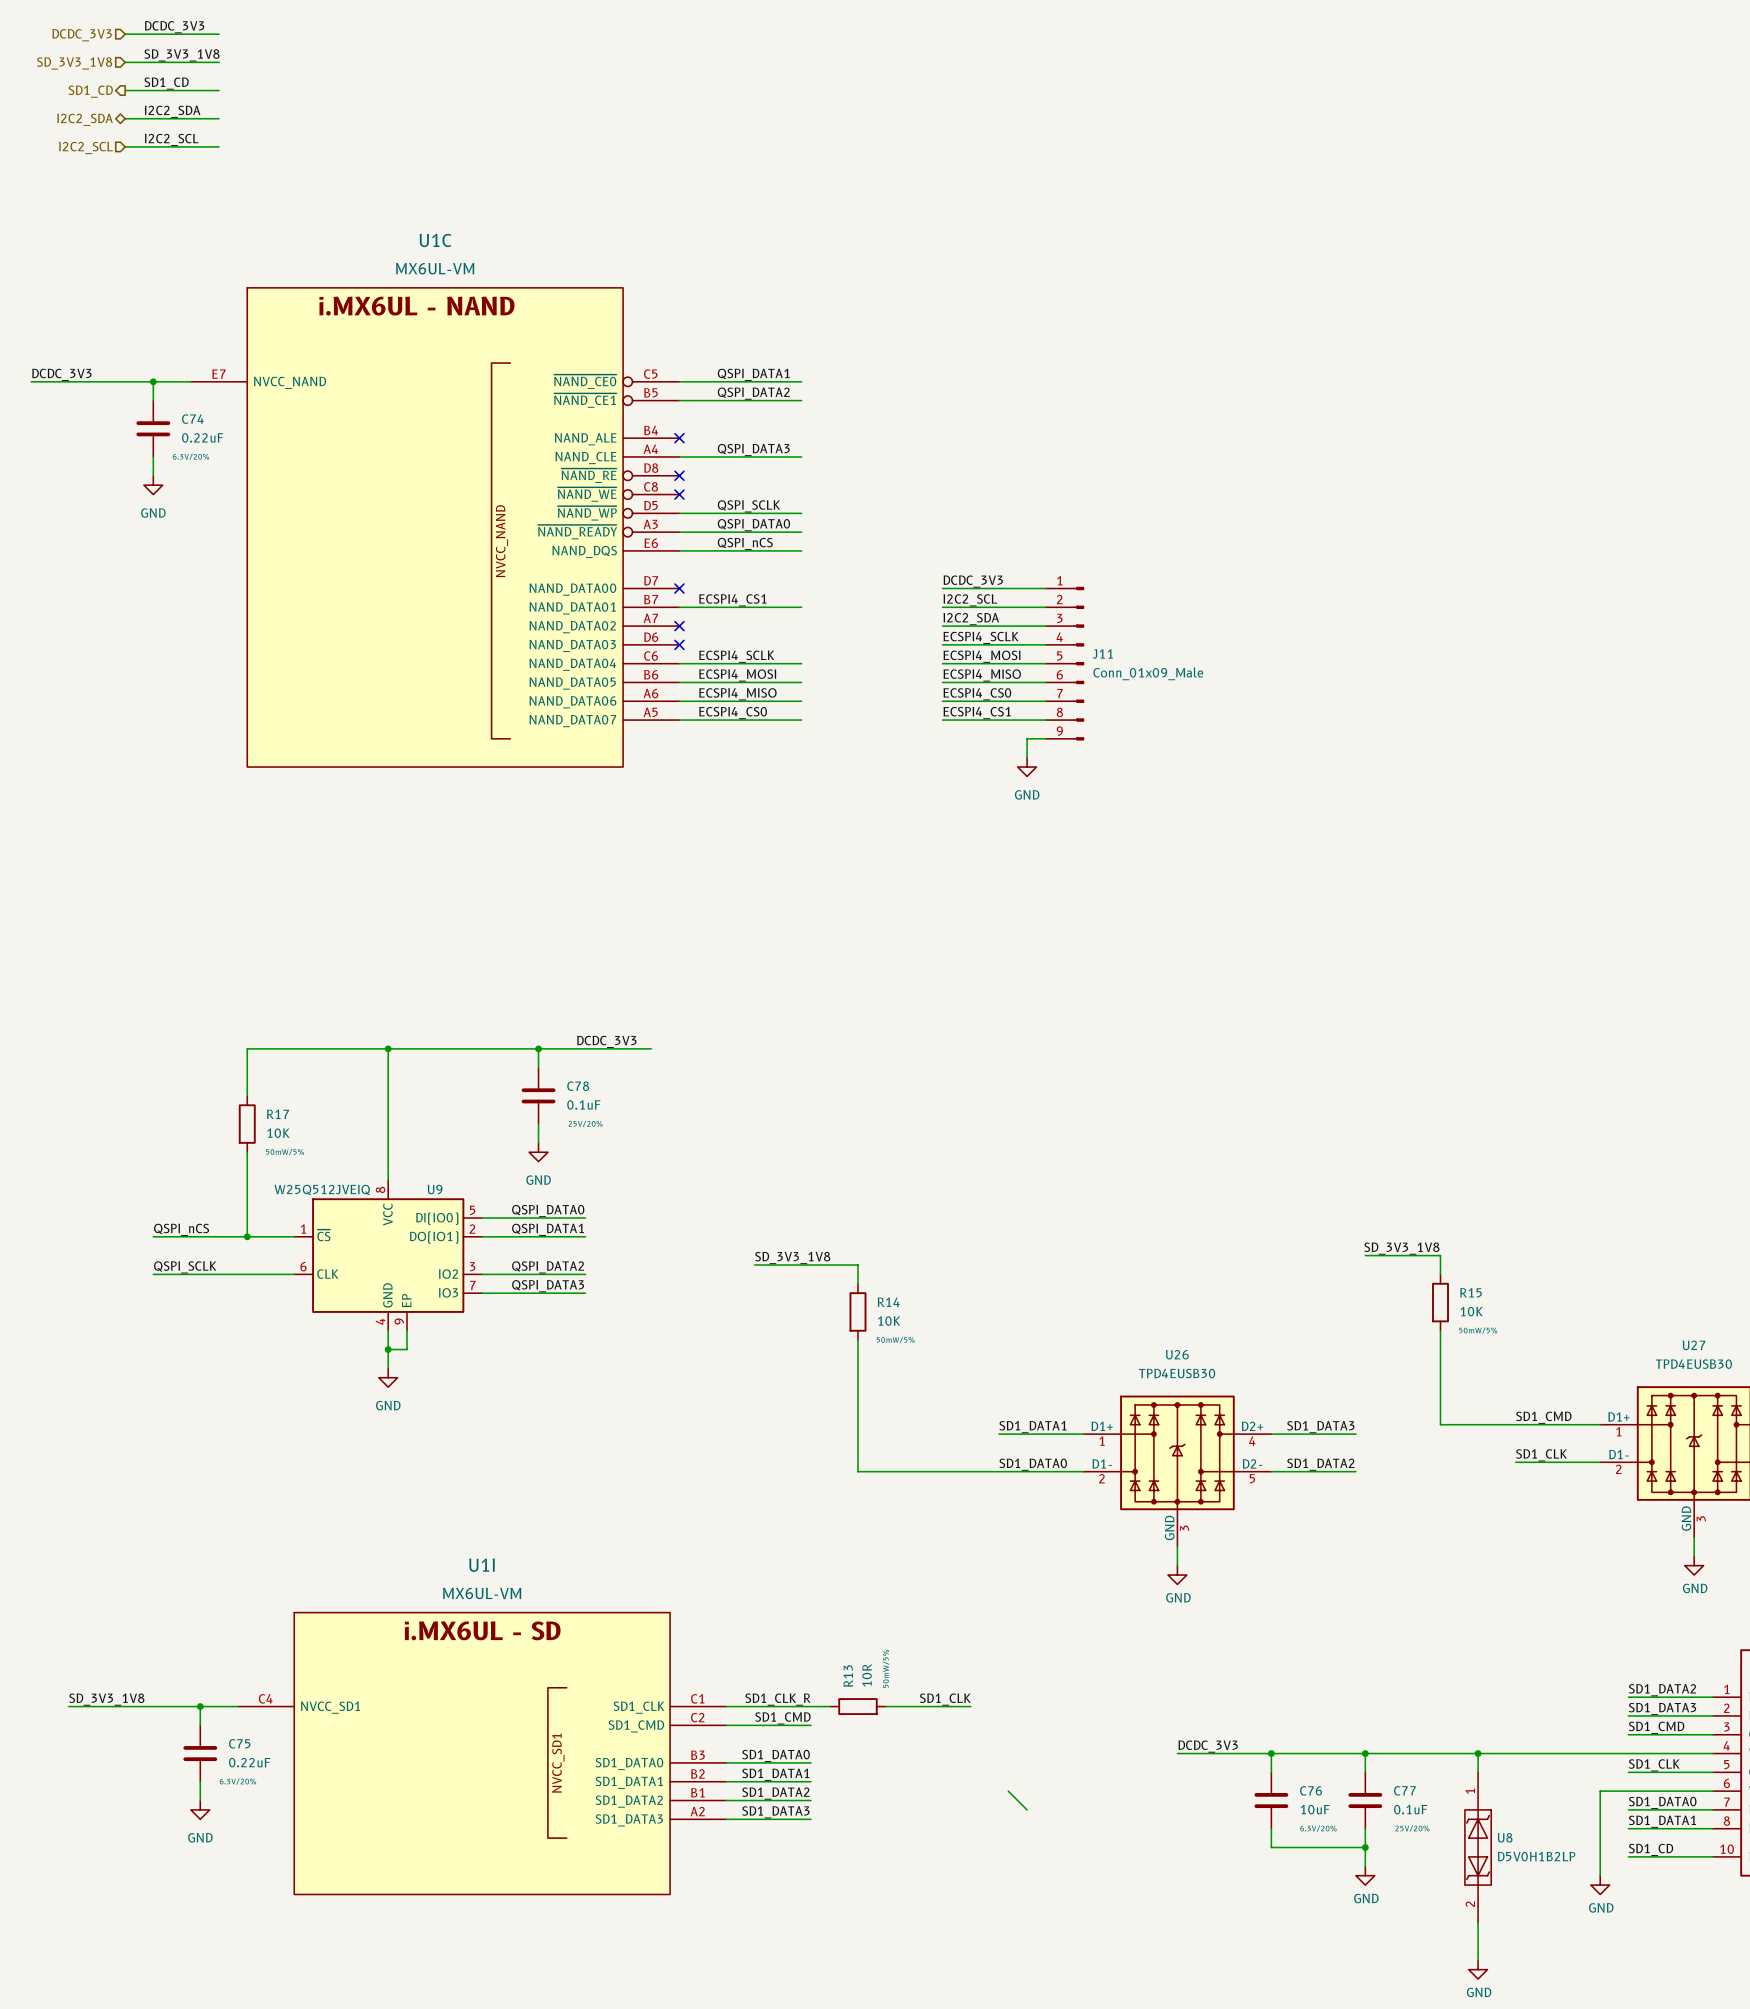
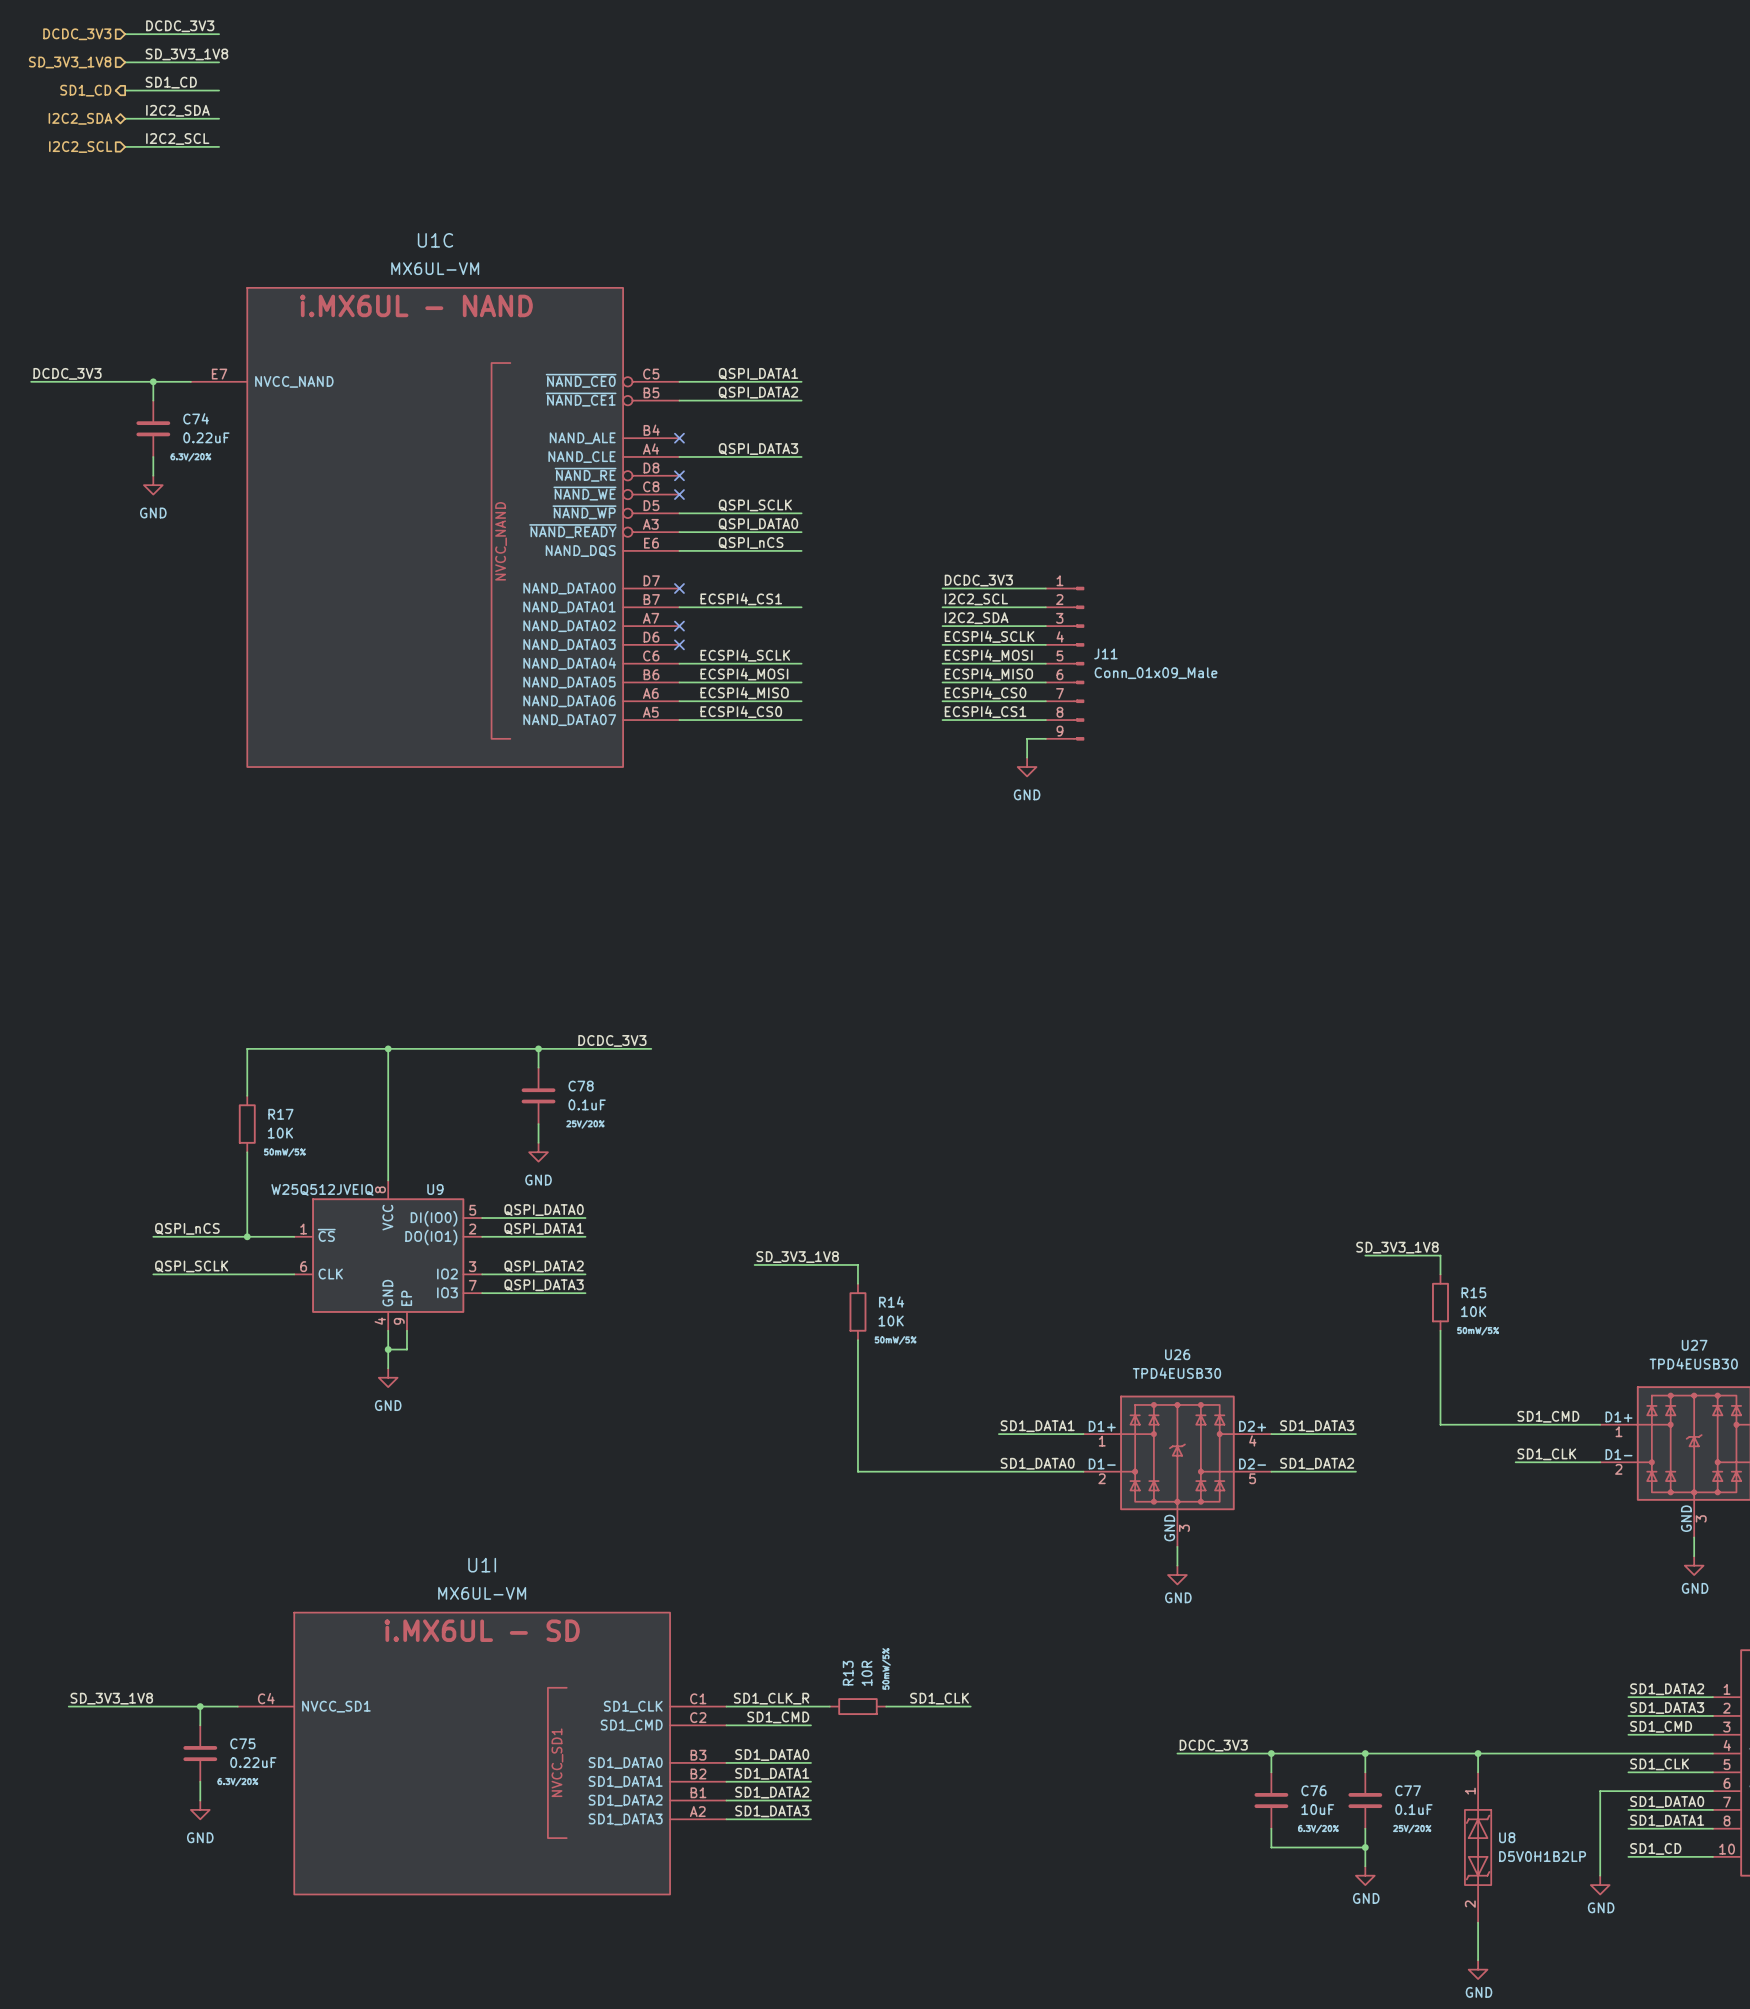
wire: (1008, 1791) (1027, 1809) -> none

